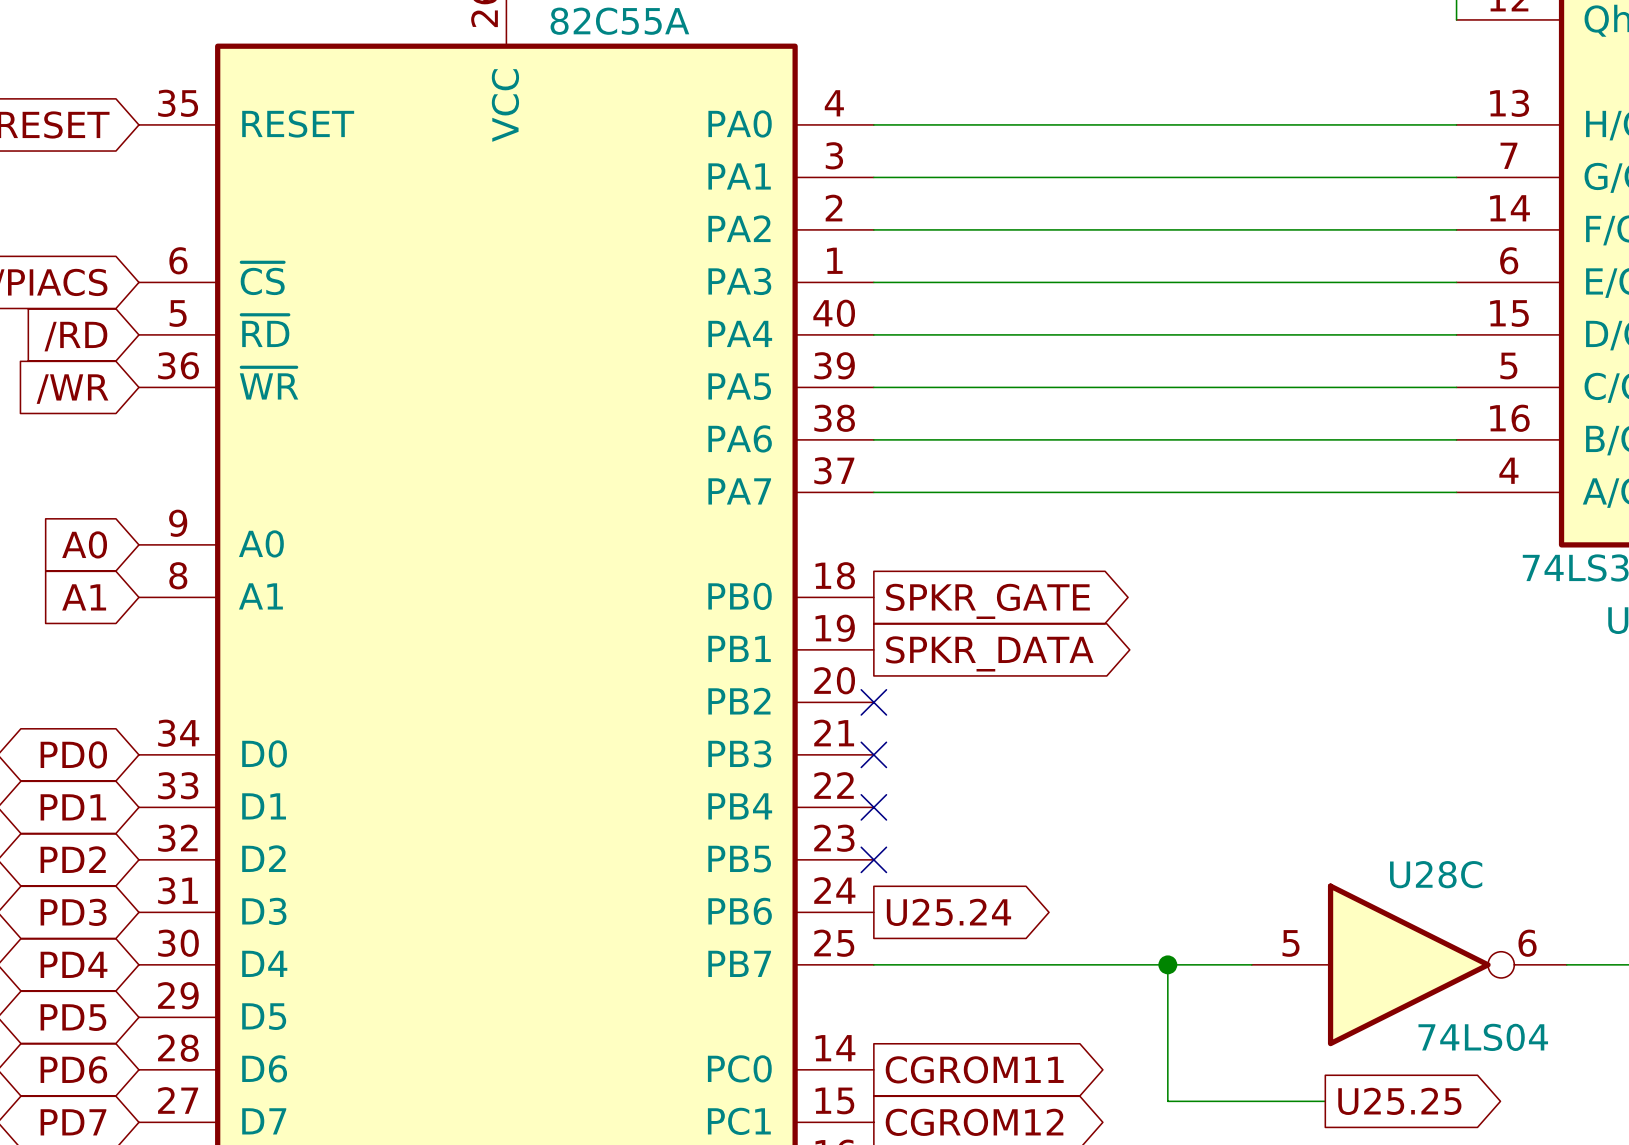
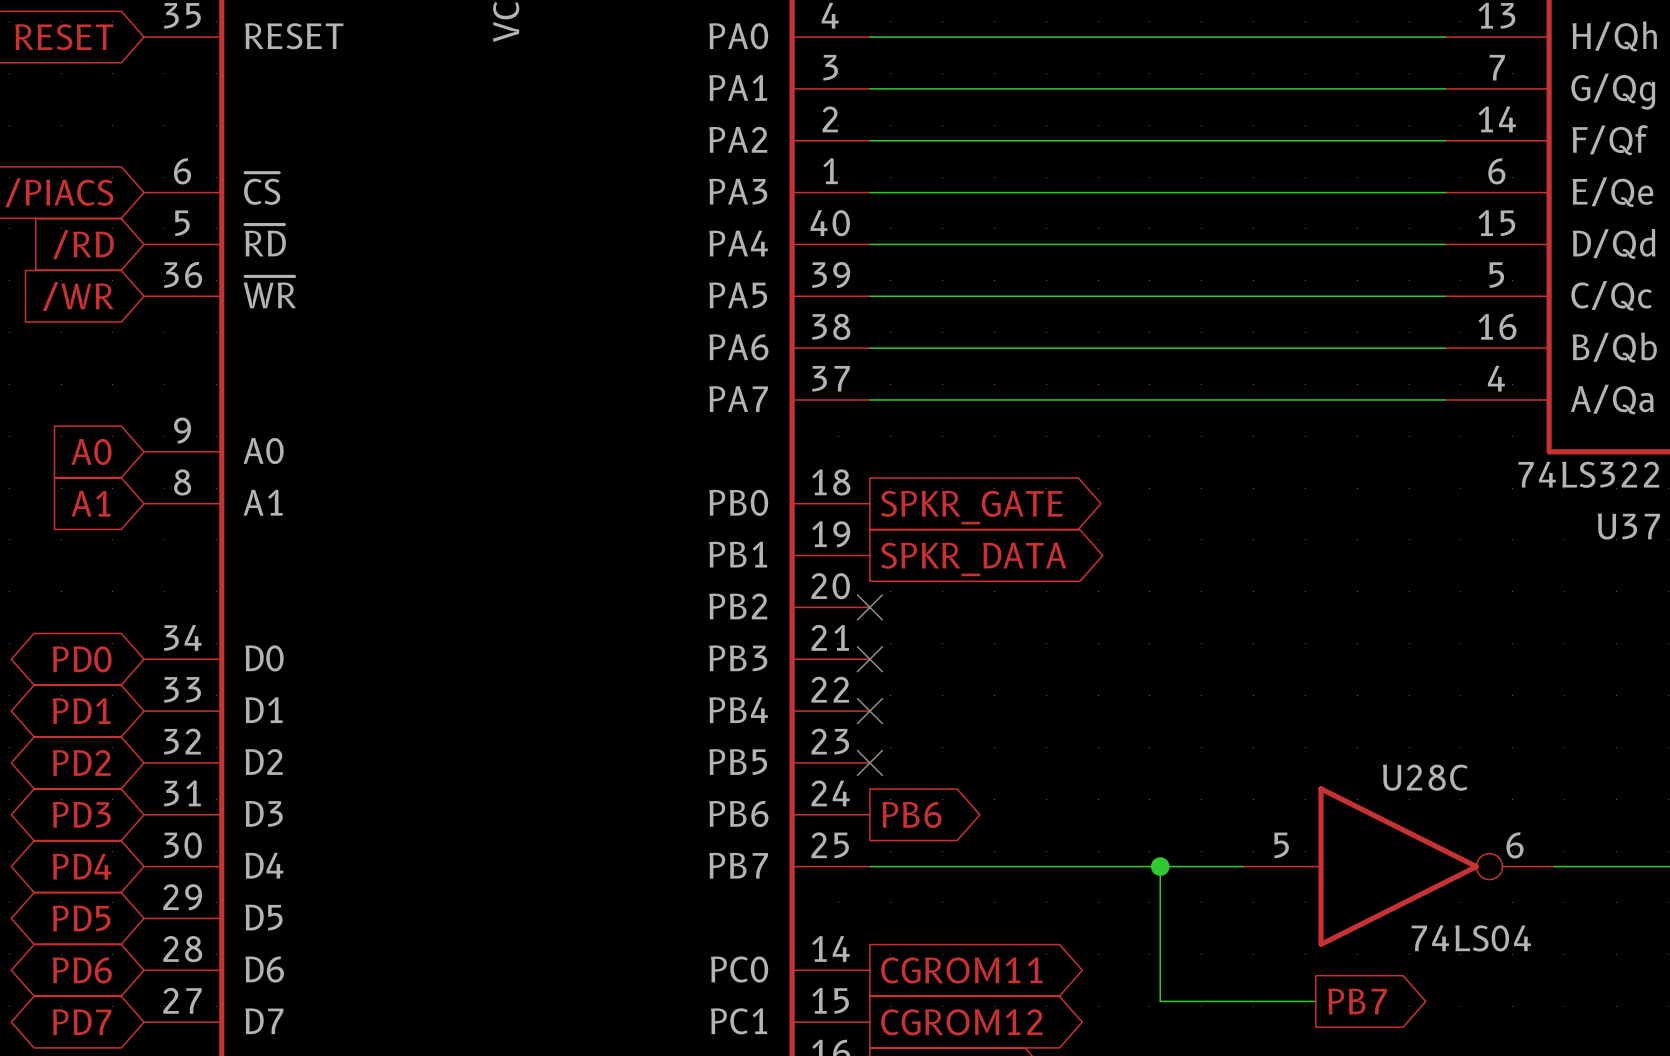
global label: U25.24 (948, 912) -> PB6 (911, 814)
global label: U25.25 (1399, 1101) -> PB7 (1357, 1001)

